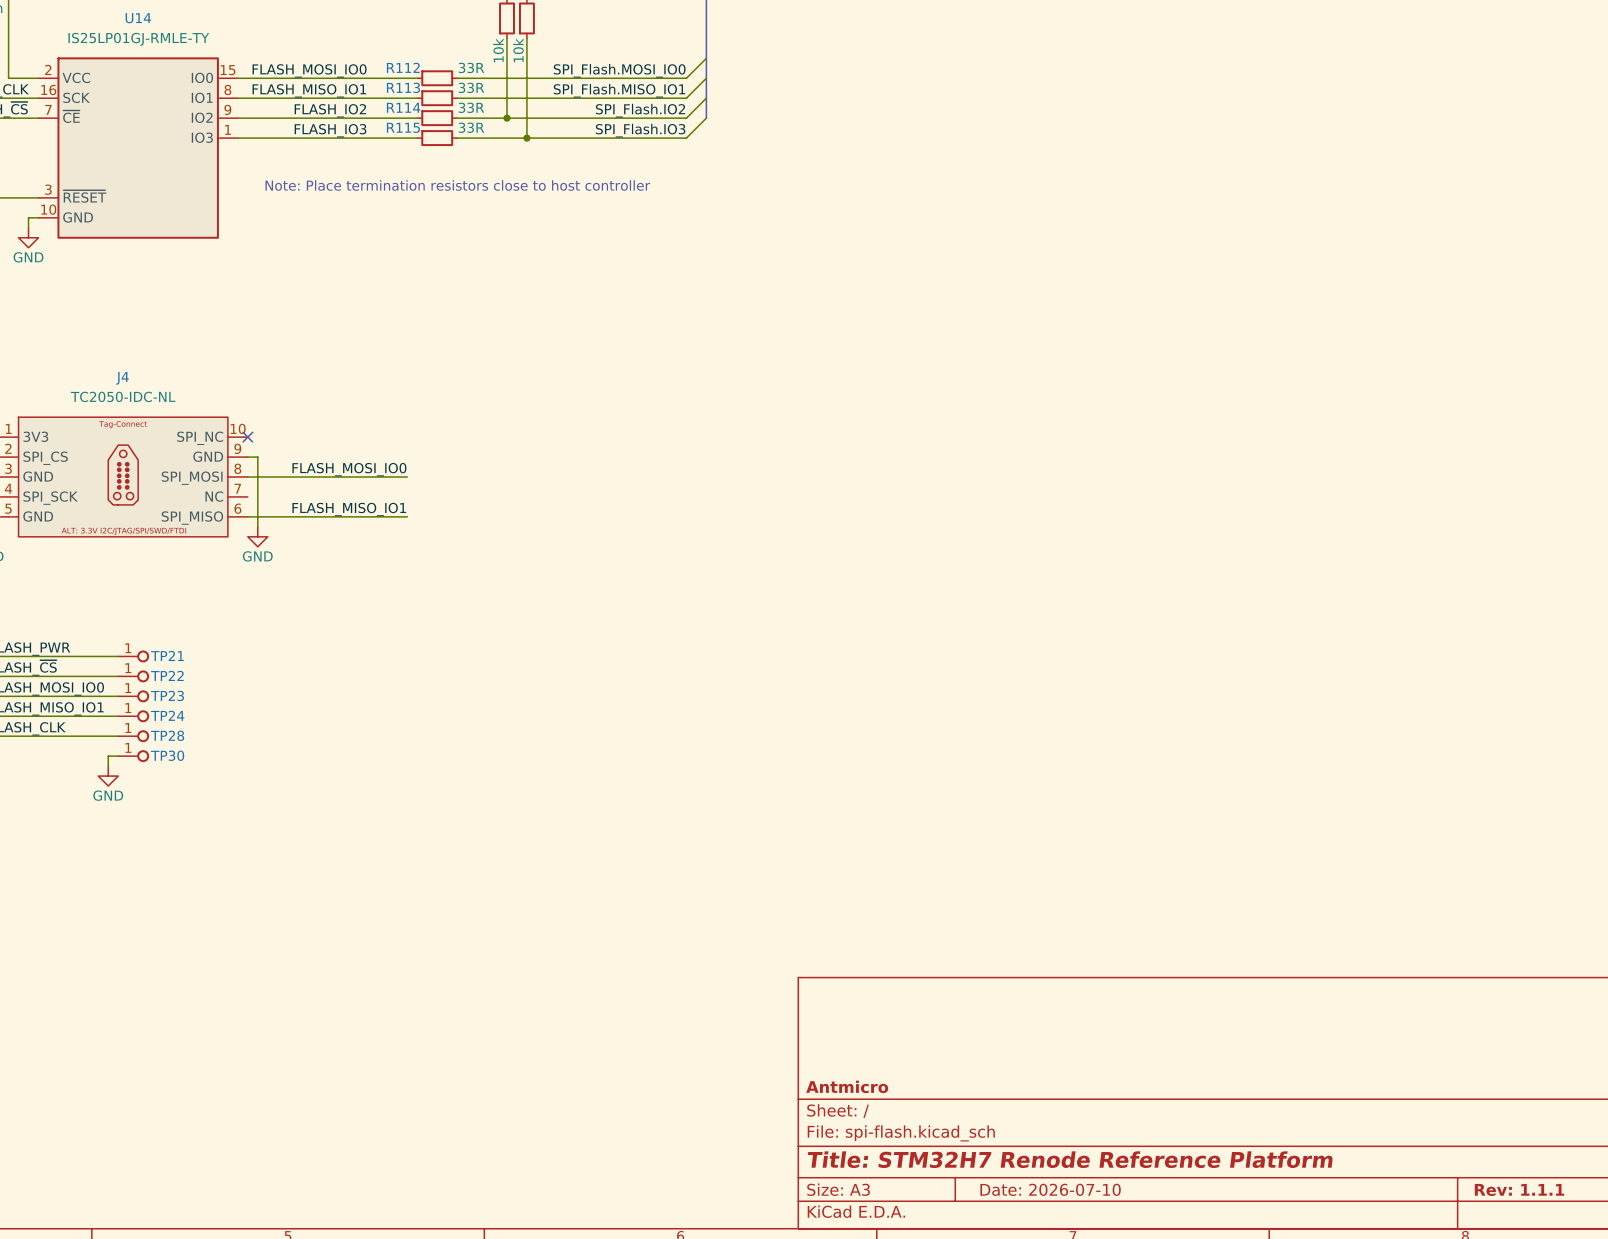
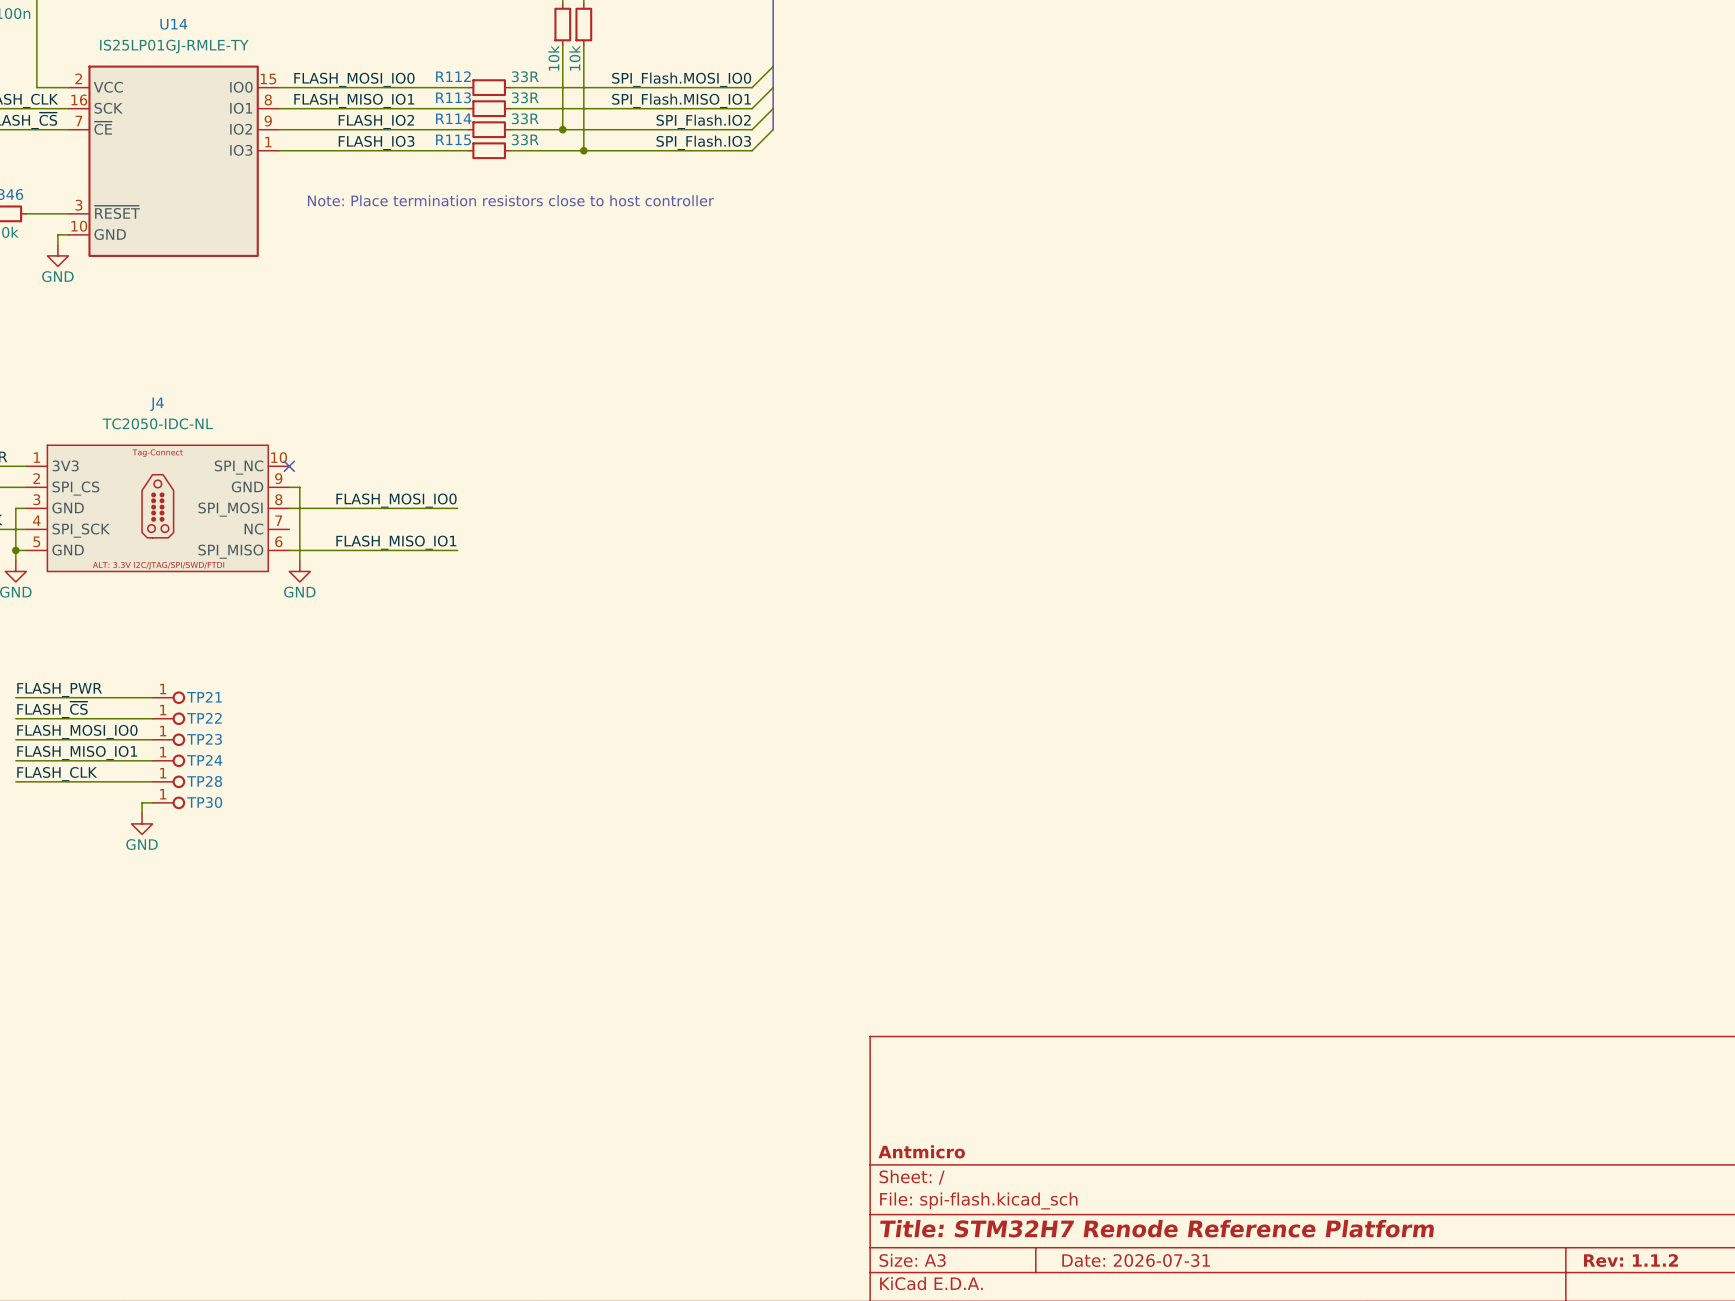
title block: Date: 2026-07-10 (1050, 1189) -> Date: 2026-07-31 (1136, 1260)
title block: Rev: 1.1.1 (1519, 1189) -> Rev: 1.1.2 (1630, 1260)

